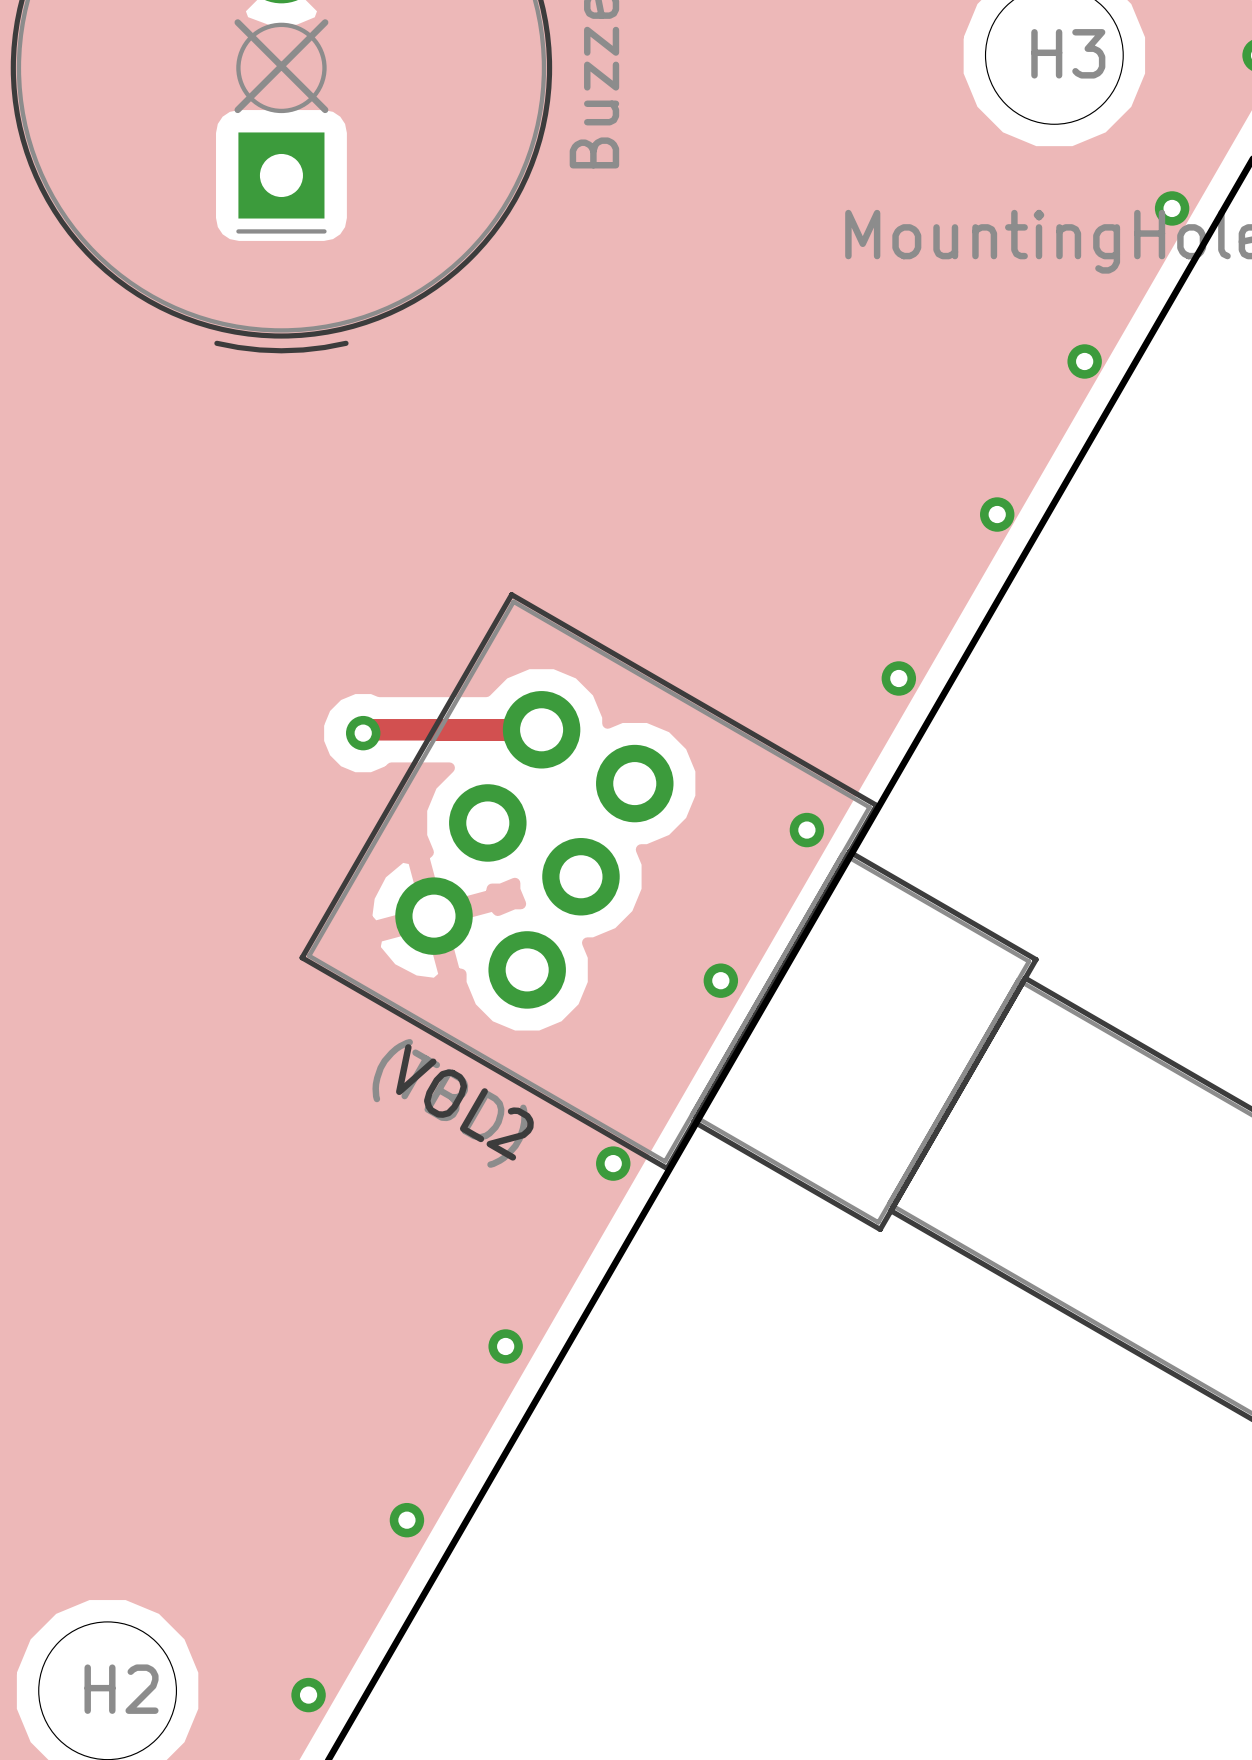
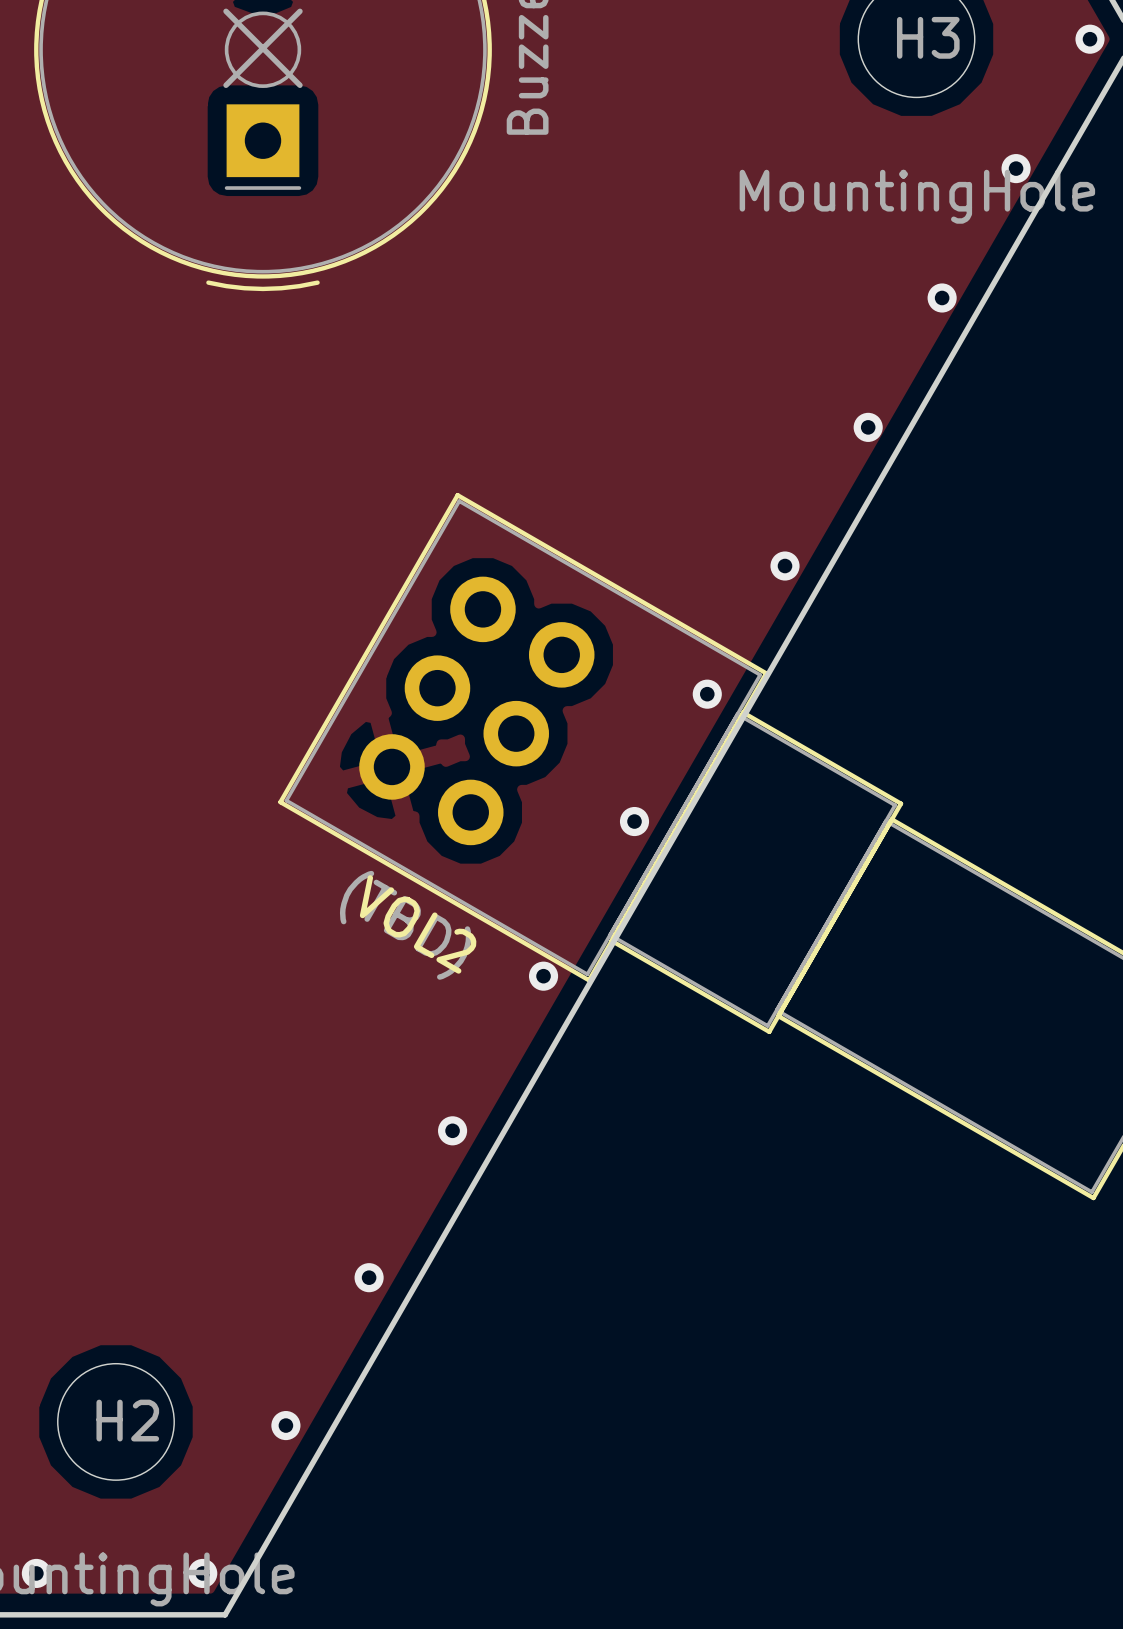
track: (541, 729) (366, 729) (363, 733) -> none
via: (363, 733) -> none

